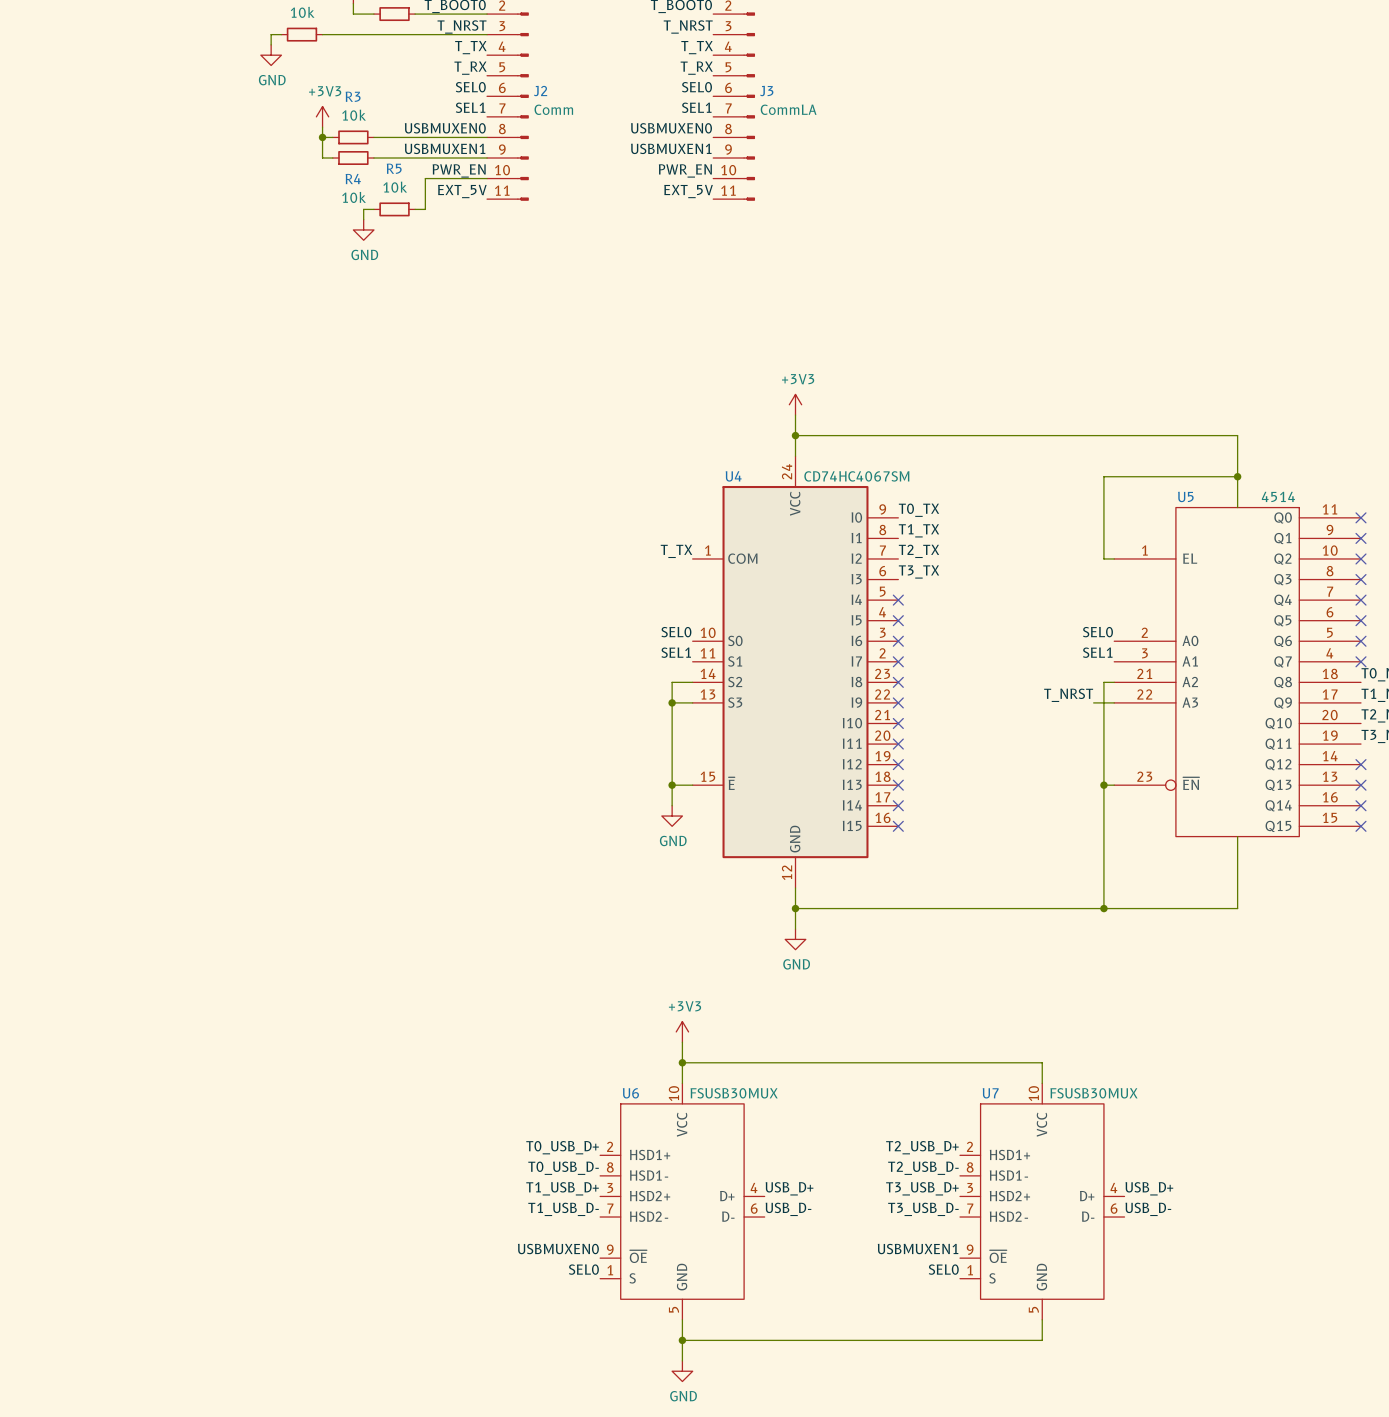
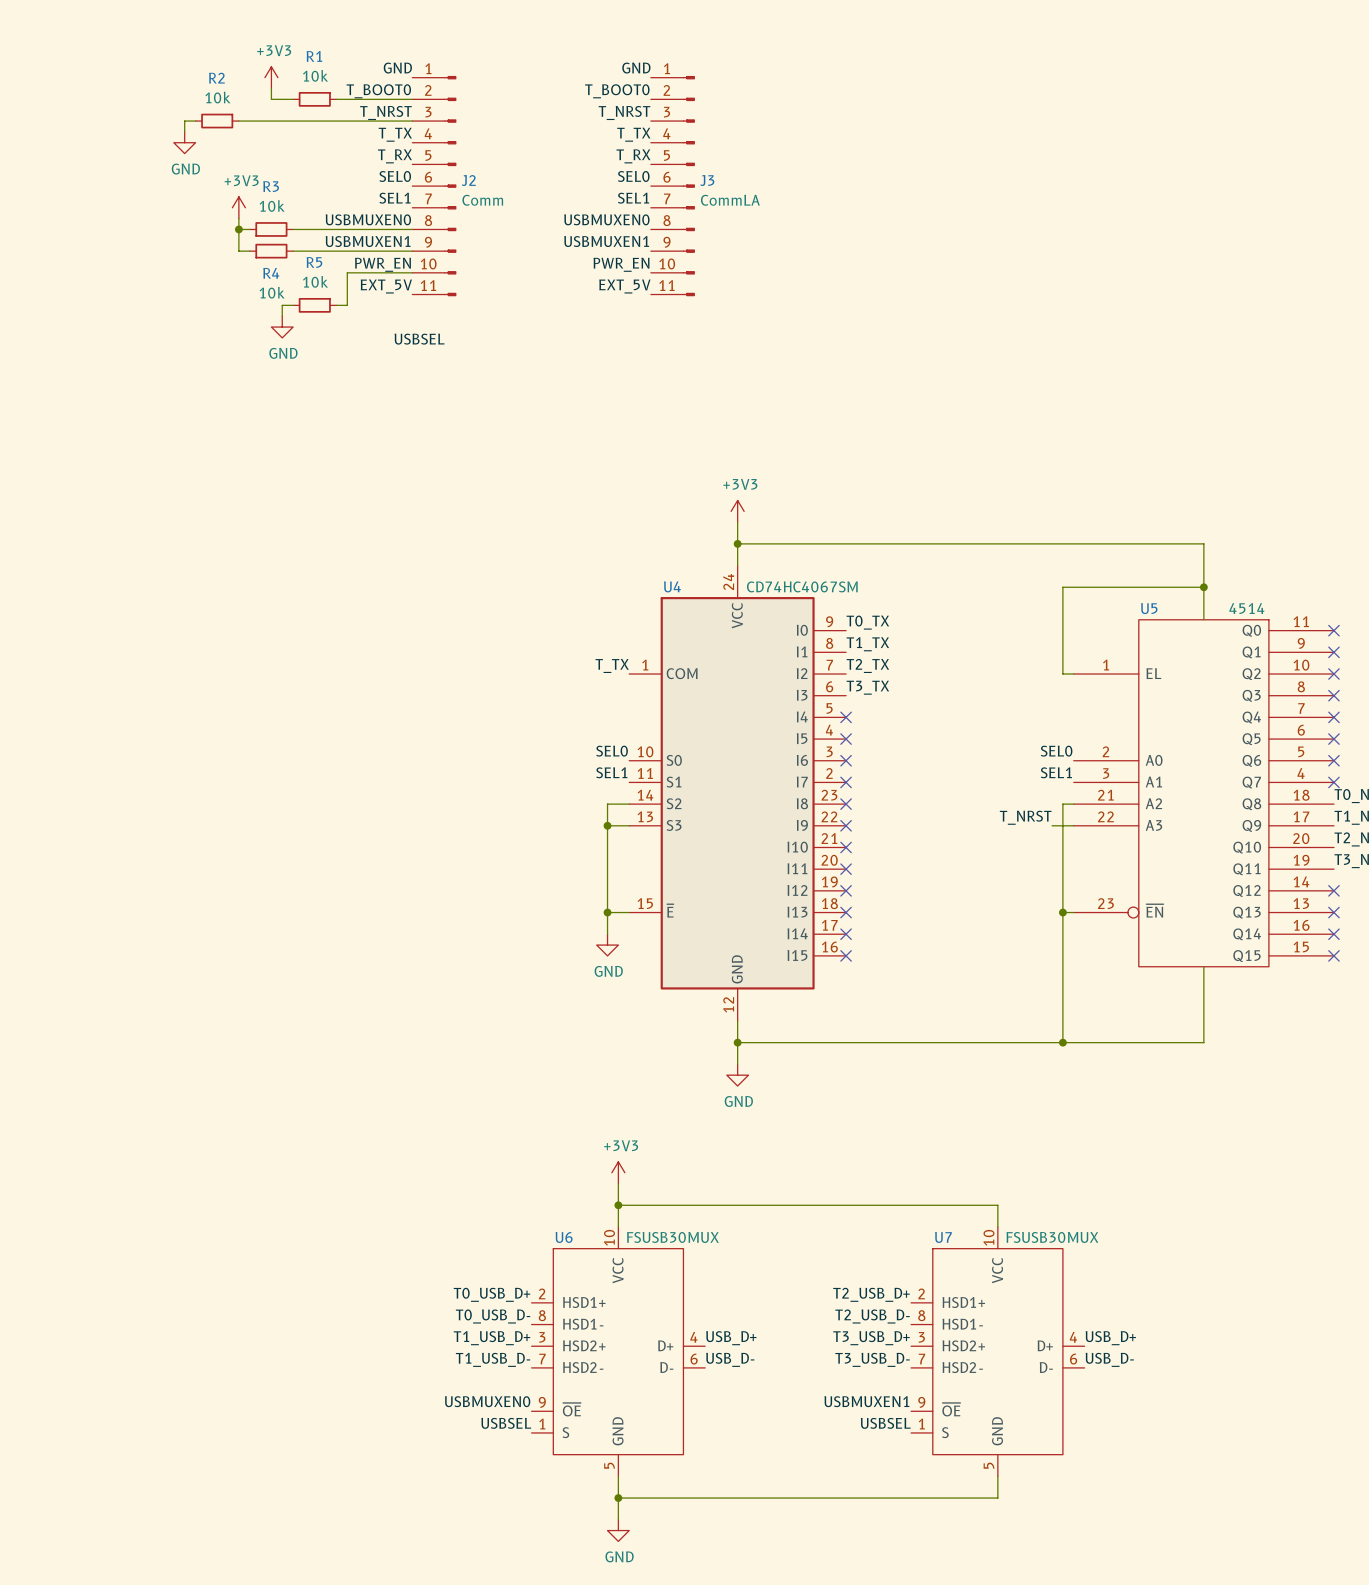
label: none -> USBSEL (419, 339)
label: SEL0 (583, 1269) -> USBSEL (506, 1423)
label: SEL0 (943, 1269) -> USBSEL (885, 1423)

